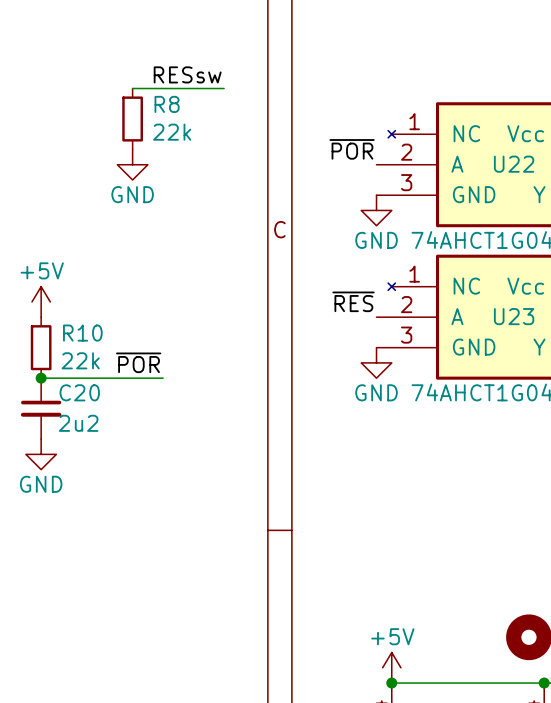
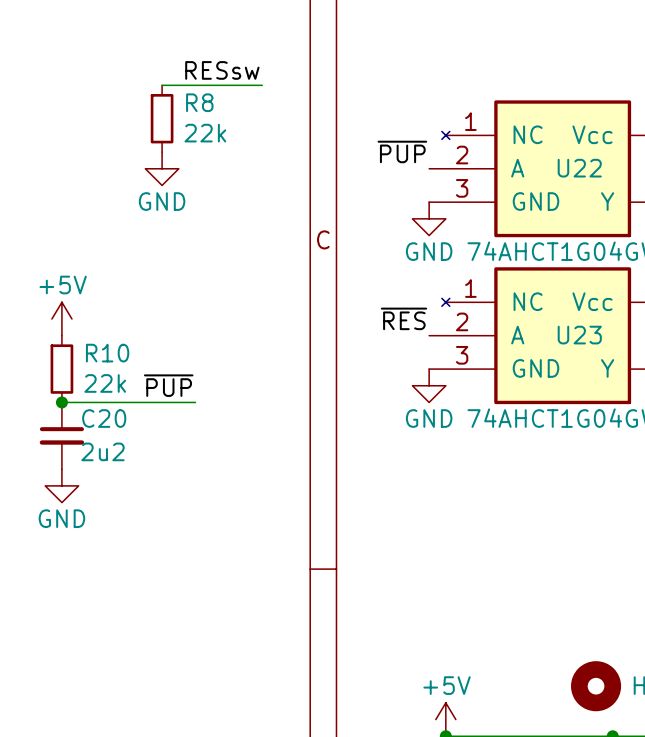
label: ~{POR} (352, 149) -> ~{PUP} (402, 151)
label: ~{POR} (138, 362) -> ~{PUP} (168, 385)

